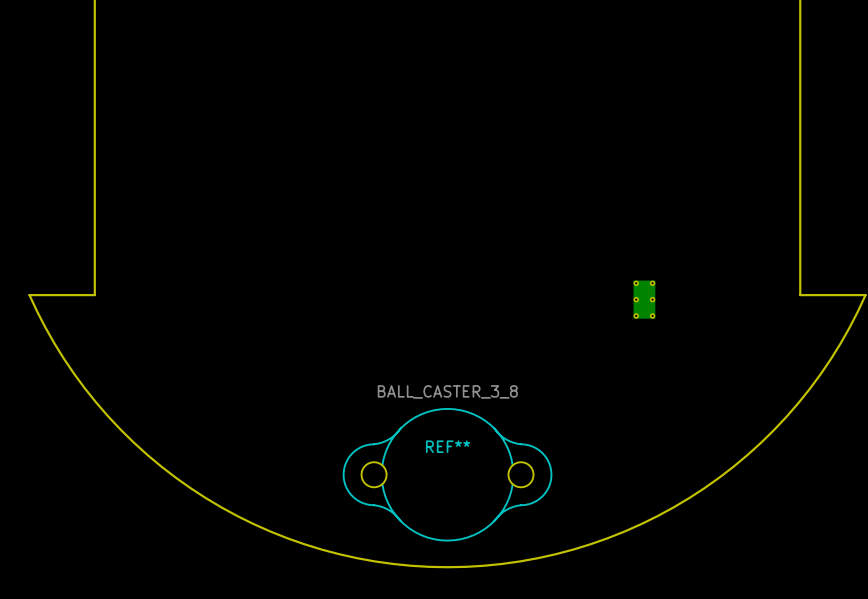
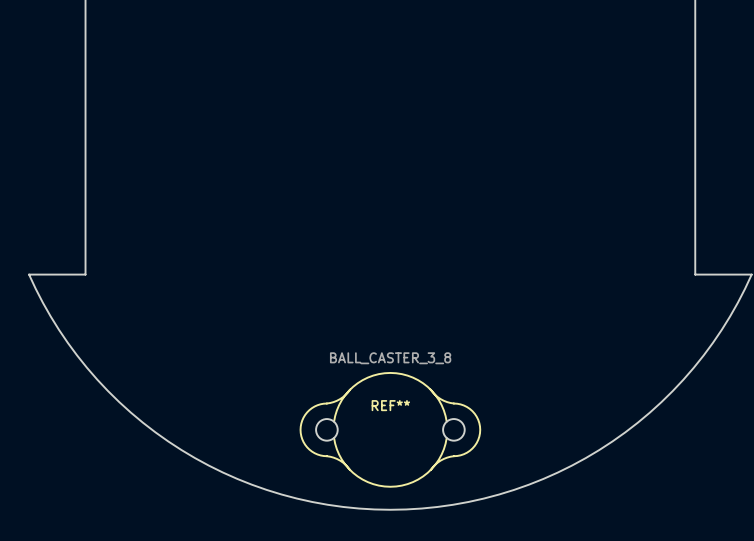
part: (644, 299) -> none

